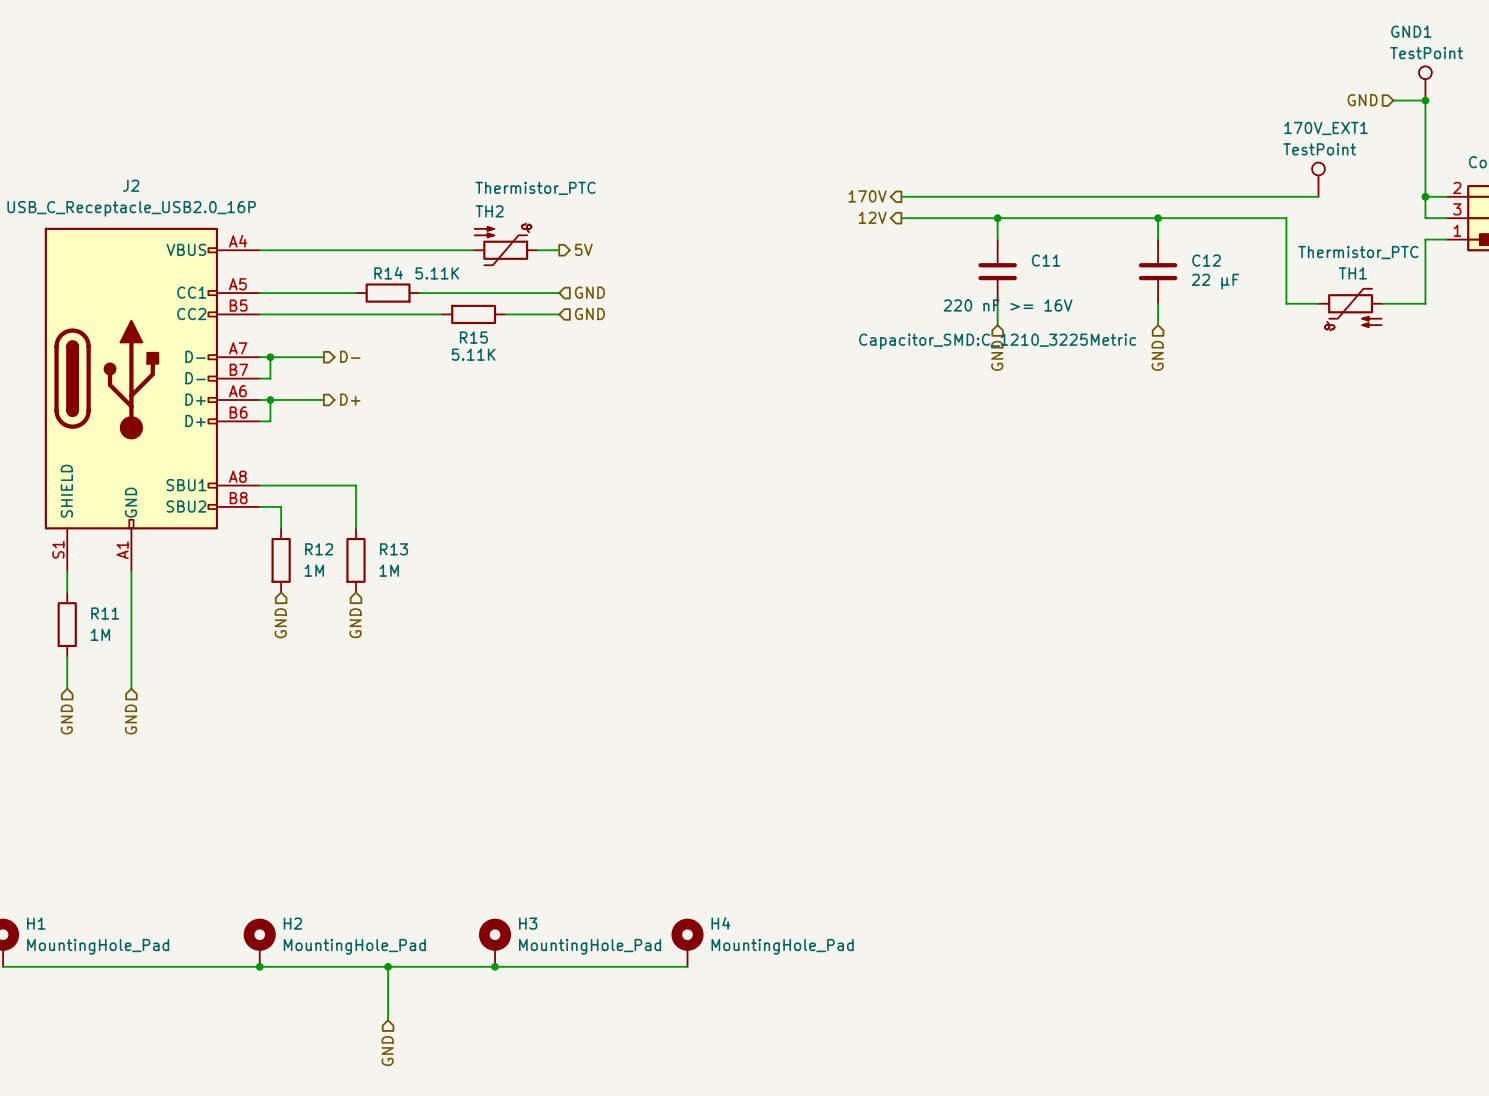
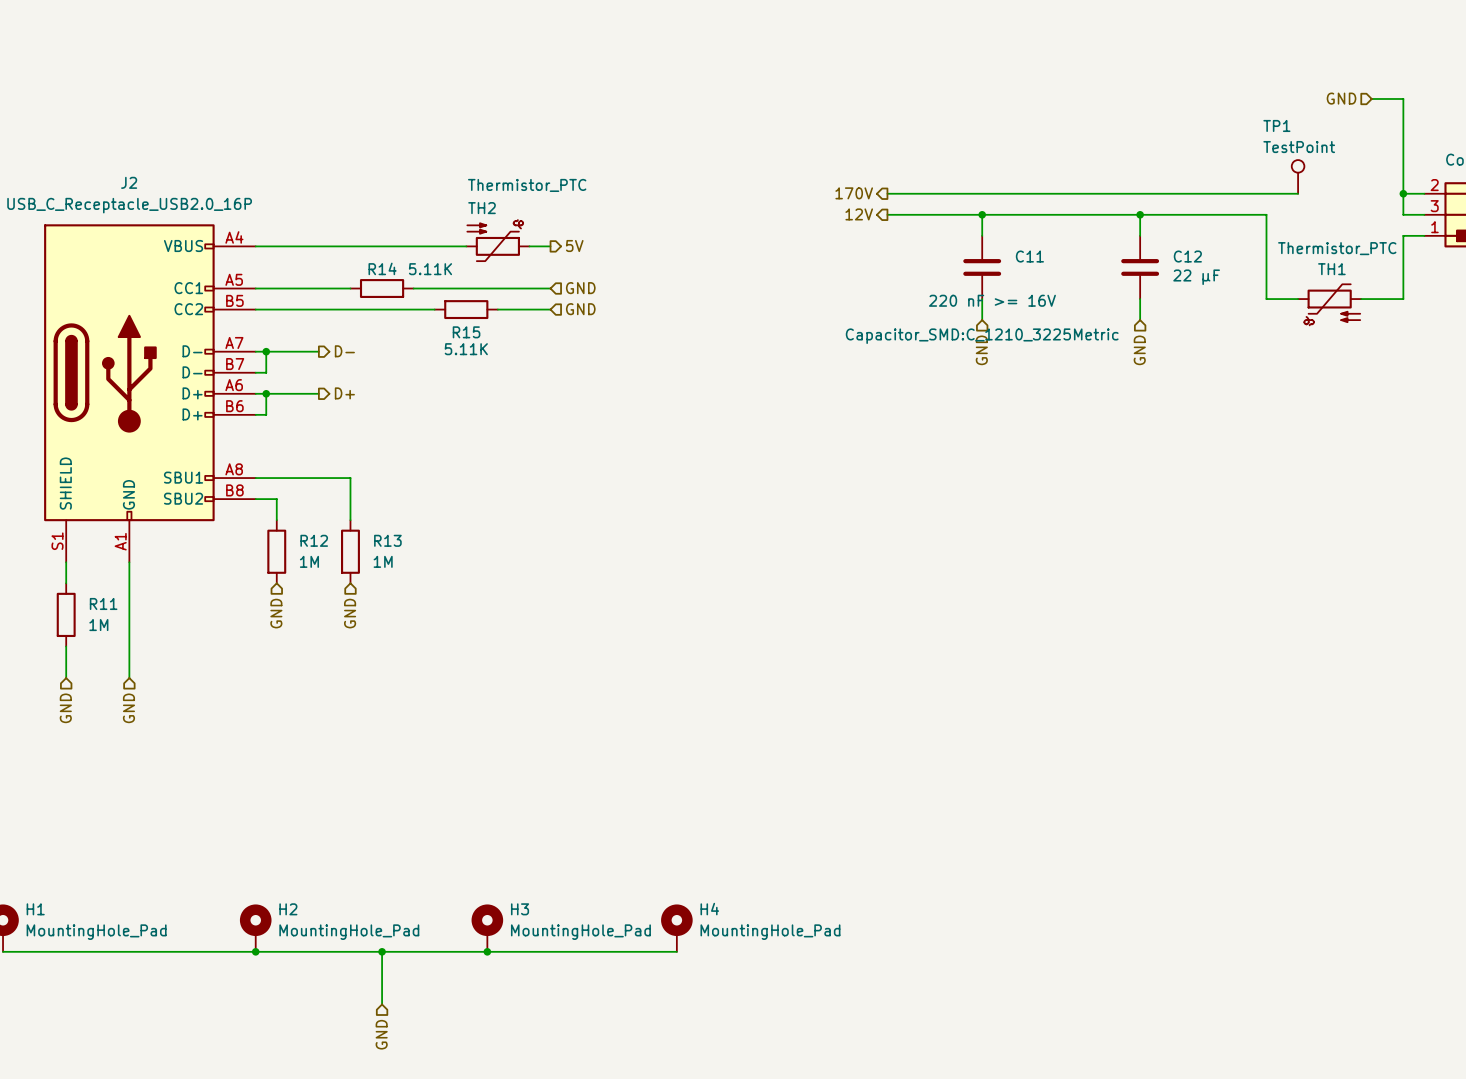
GND1: TestPoint (1425, 83) -> none
junction: (1425, 100) -> none
170V_EXT1 name: 170V_EXT1 (1326, 128) -> TP1 (1276, 125)

